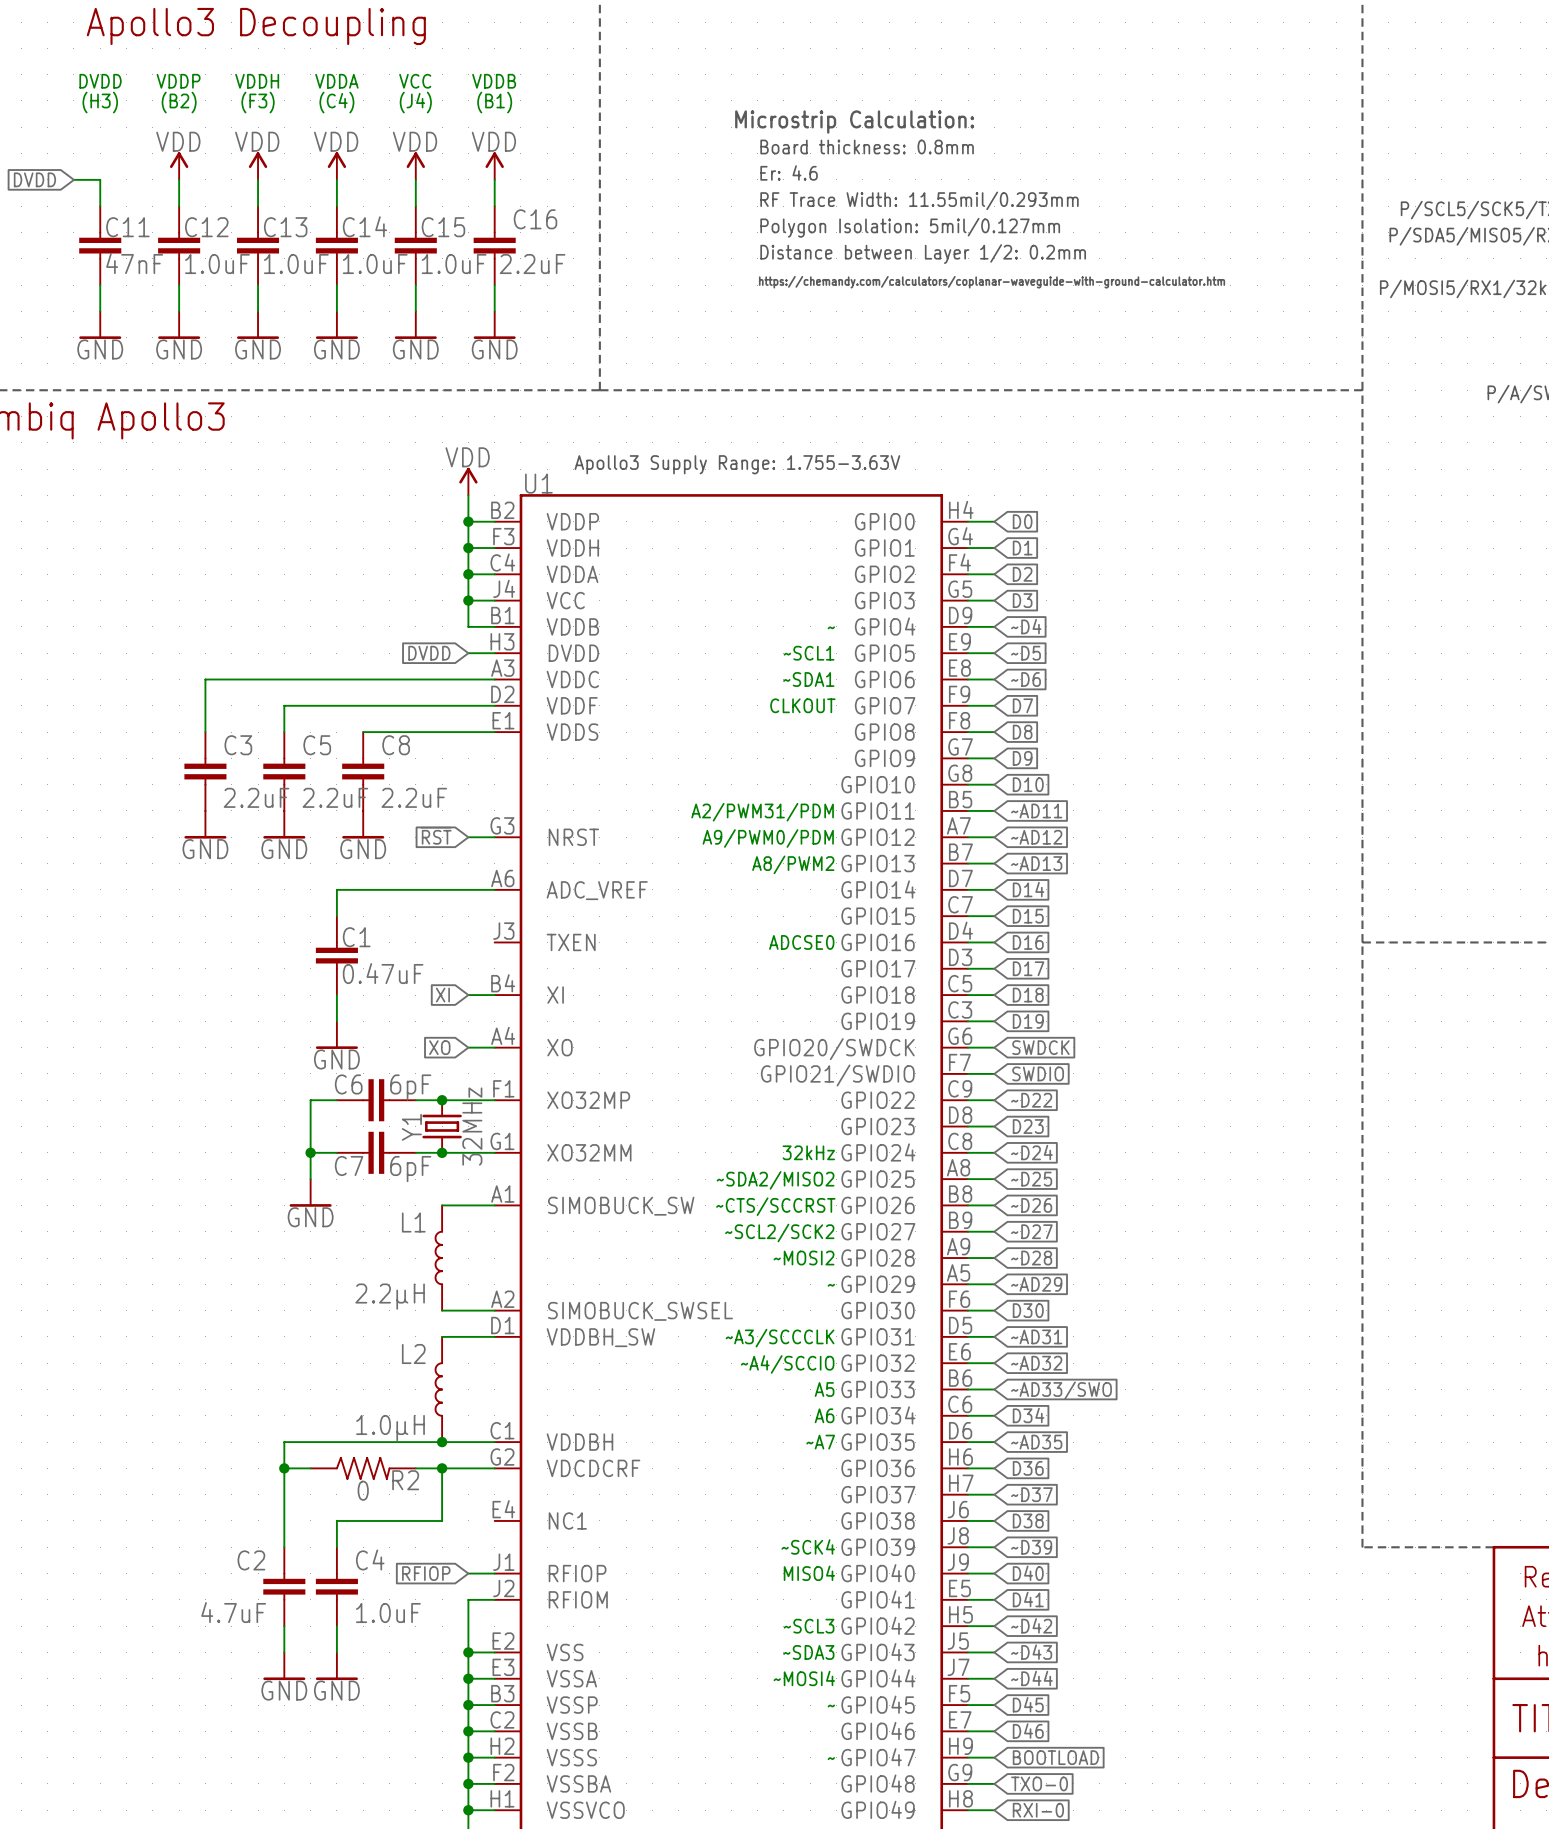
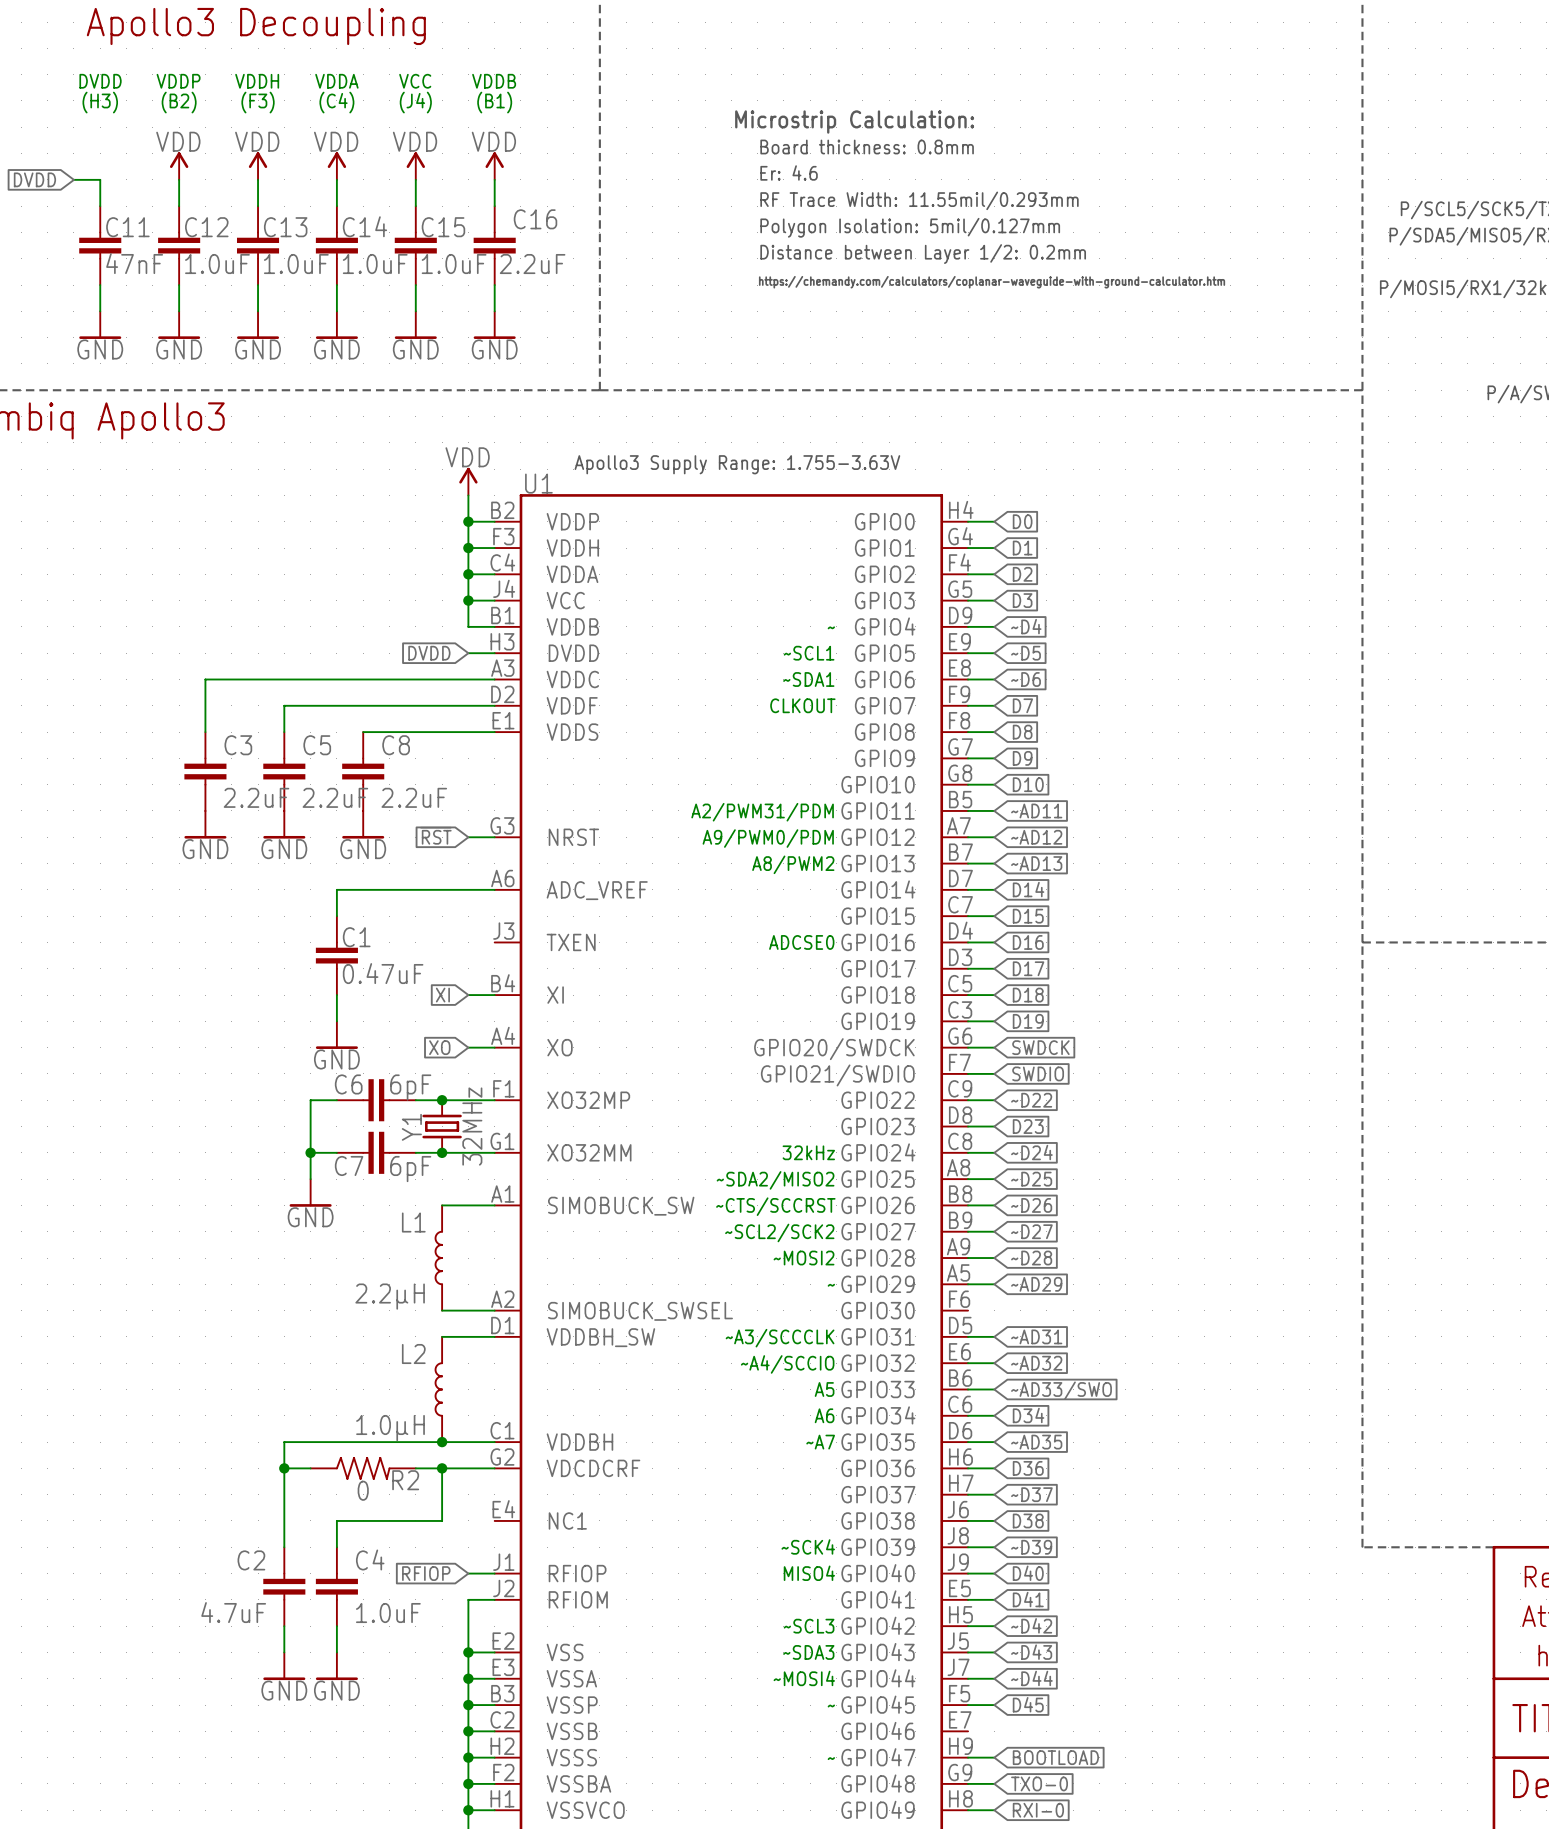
wire: (968, 1310) (994, 1310) -> none
global label: D30 (1028, 1310) -> none
wire: (968, 1731) (994, 1731) -> none
global label: D46 (1028, 1731) -> none

